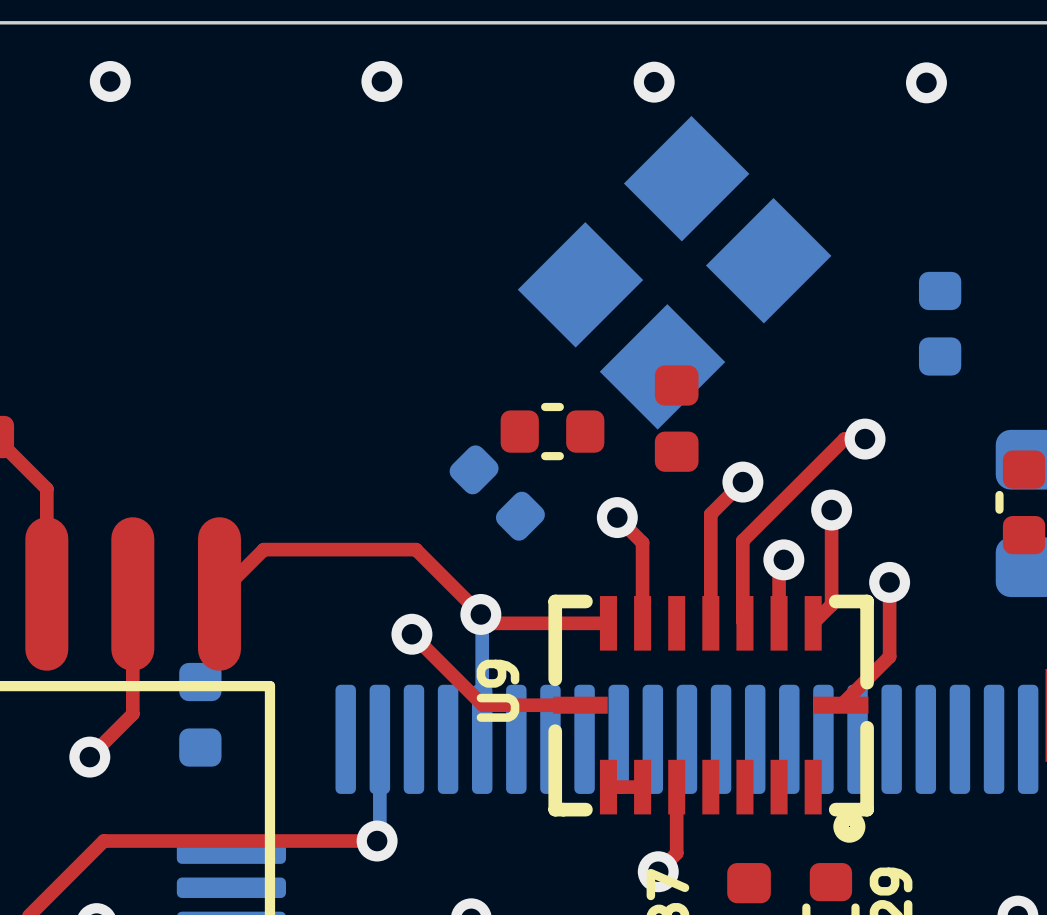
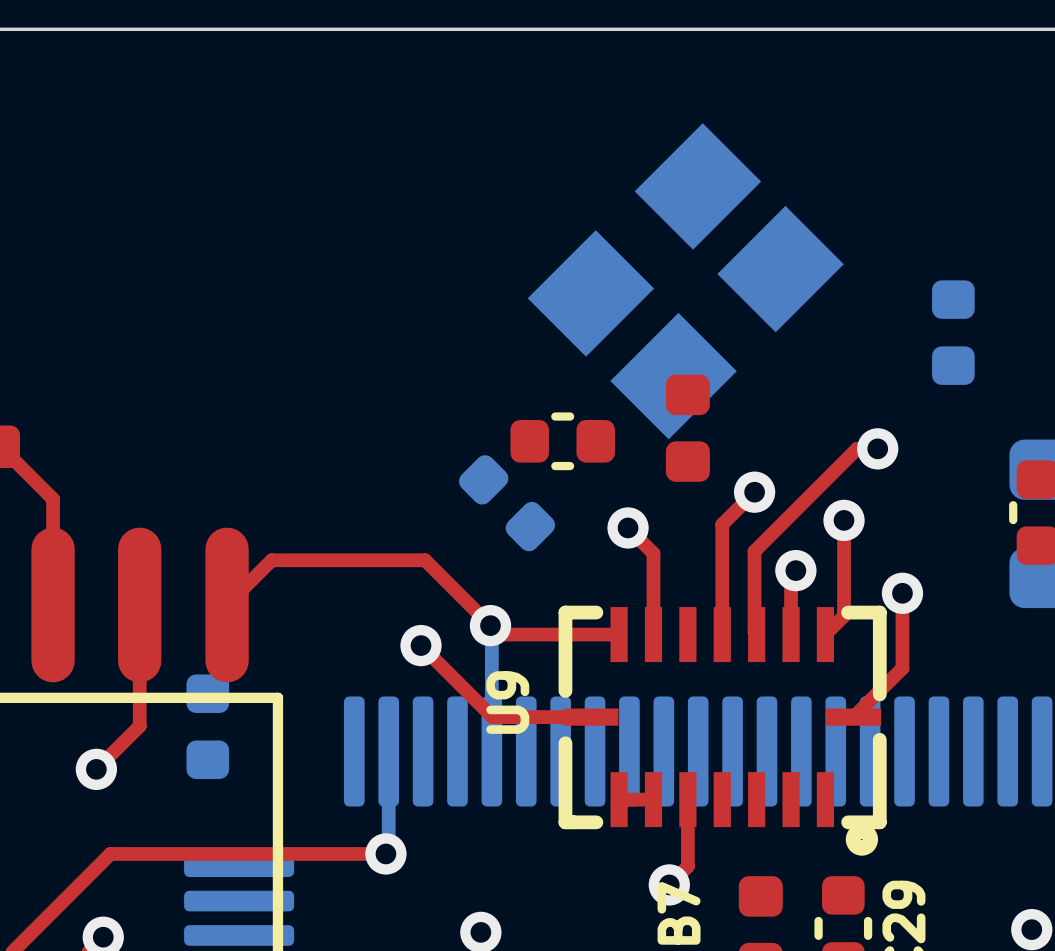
via: (110, 81) -> none
via: (381, 81) -> none
via: (654, 82) -> none
via: (926, 82) -> none

